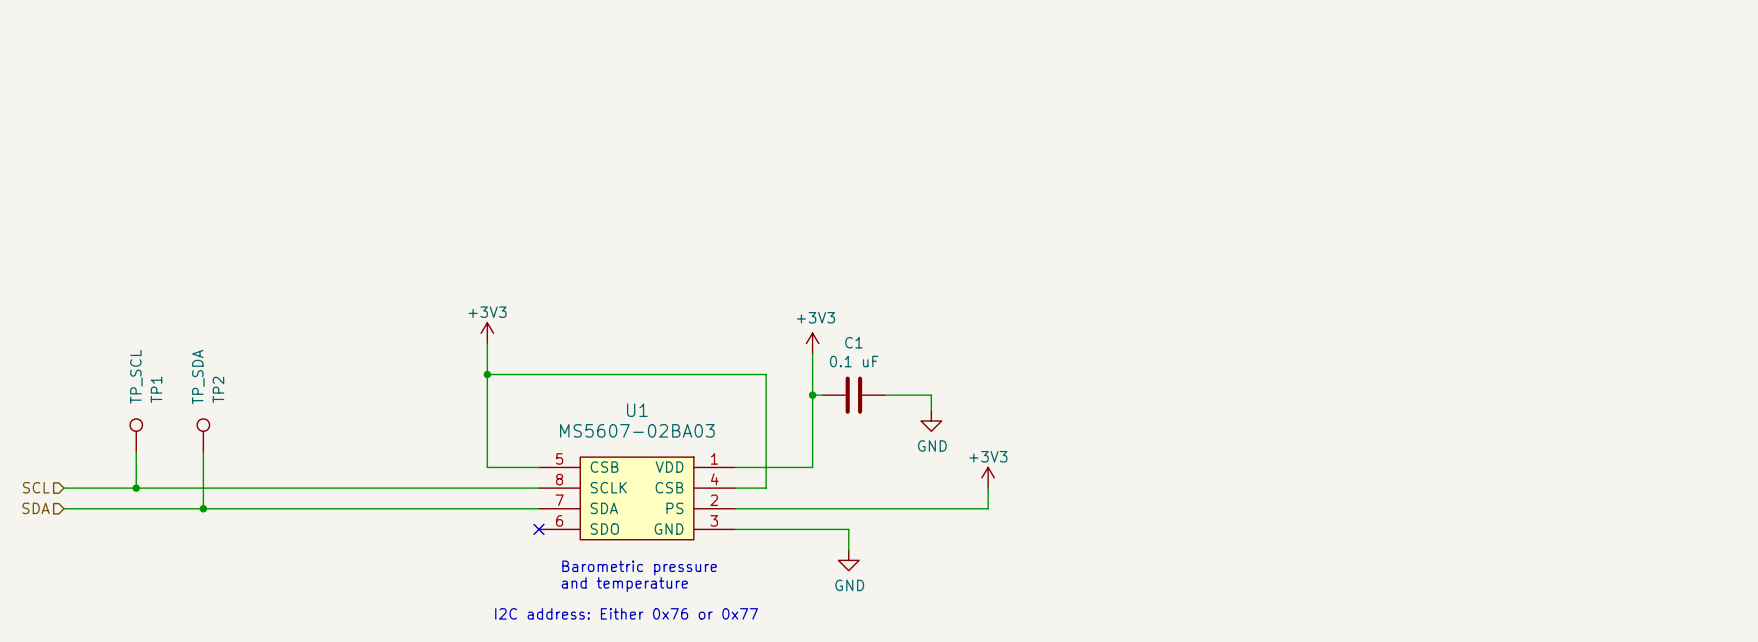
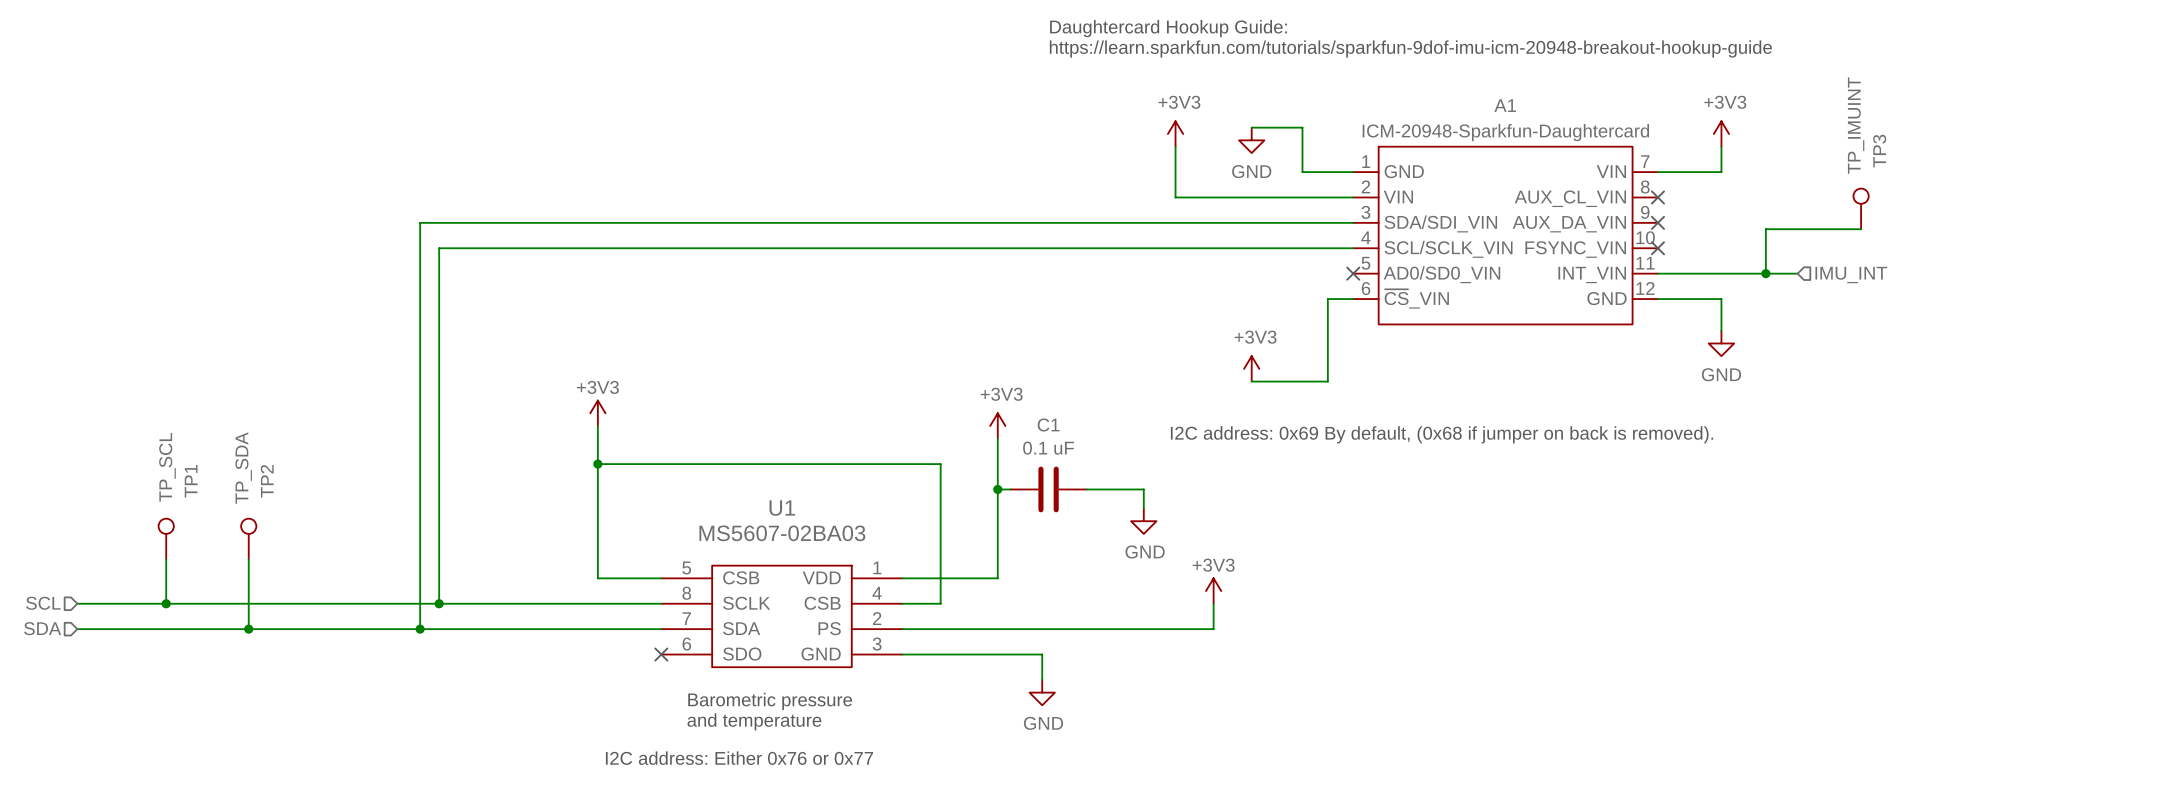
text: none -> Daughtercard Hookup Guide: (1168, 28)
text: none -> https://learn.sparkfun.com/tutorials/sparkfun-9dof-imu-icm-20948-breakout-hookup-guide (1410, 49)
wire: none -> (1251, 127) (1302, 127) (1302, 172) (1353, 172)
power symbol: none -> +3V3 (1175, 134)
power symbol: none -> +3V3 (1721, 134)
power symbol: none -> GND (1251, 140)
wire: none -> (1175, 146) (1175, 197) (1353, 197)
wire: none -> (1721, 146) (1721, 172) (1657, 172)
no-connect mark: none -> (1657, 197)
TP3: none -> TP_IMUINT (1861, 208)
wire: none -> (1353, 222) (420, 222) (420, 629)
no-connect mark: none -> (1657, 222)
wire: none -> (1861, 229) (1765, 229) (1765, 273)
A1: none -> ICM-20948-Sparkfun-Daughtercard (1505, 235)
wire: none -> (1353, 248) (439, 248) (439, 603)
no-connect mark: none -> (1657, 248)
no-connect mark: none -> (1353, 273)
wire: none -> (1657, 273) (1797, 273)
junction: none -> (1765, 273)
hierarchical label: none -> IMU_INT (1851, 275)
wire: none -> (1353, 299) (1327, 299) (1327, 381) (1251, 381)
wire: none -> (1657, 299) (1721, 299) (1721, 330)
power symbol: none -> GND (1721, 343)
power symbol: none -> +3V3 (1251, 368)
text: none -> I2C address: 0x69 By default, (0x68 if jumper on back is removed). (1442, 434)
junction: none -> (439, 603)
junction: none -> (420, 629)

